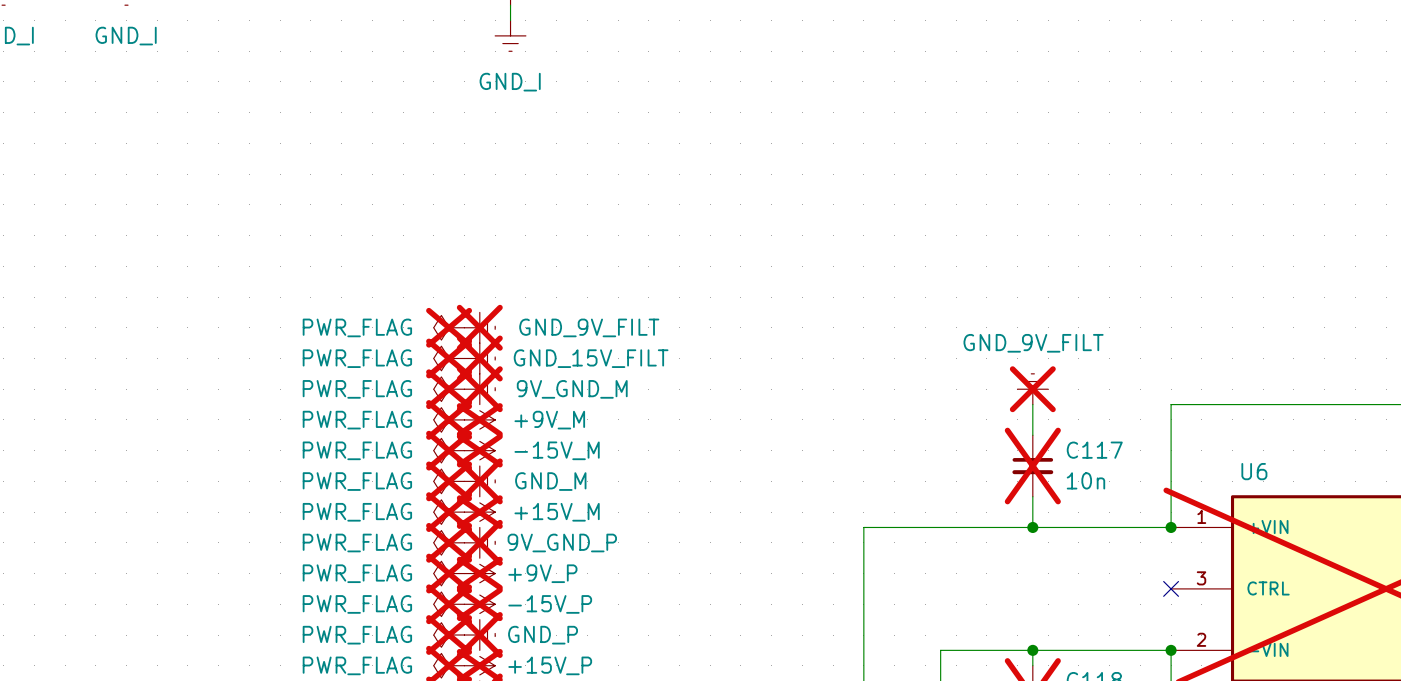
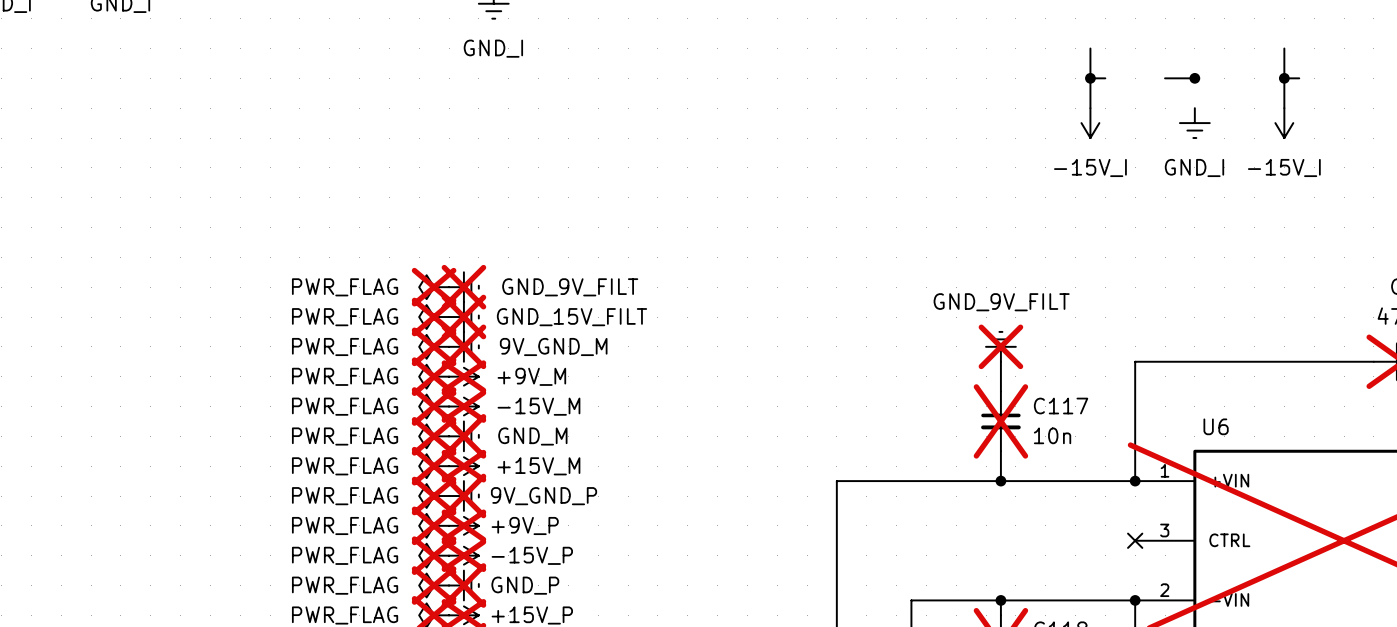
wire: none -> (1090, 48) (1090, 108)
wire: none -> (1284, 48) (1284, 108)
wire: none -> (1090, 78) (1105, 78)
junction: none -> (1090, 78)
wire: none -> (1165, 78) (1194, 78)
junction: none -> (1194, 78)
wire: none -> (1284, 78) (1299, 78)
junction: none -> (1284, 78)
power symbol: none -> -15V_I (1090, 123)
power symbol: none -> GND_I (1194, 123)
power symbol: none -> -15V_I (1284, 123)

